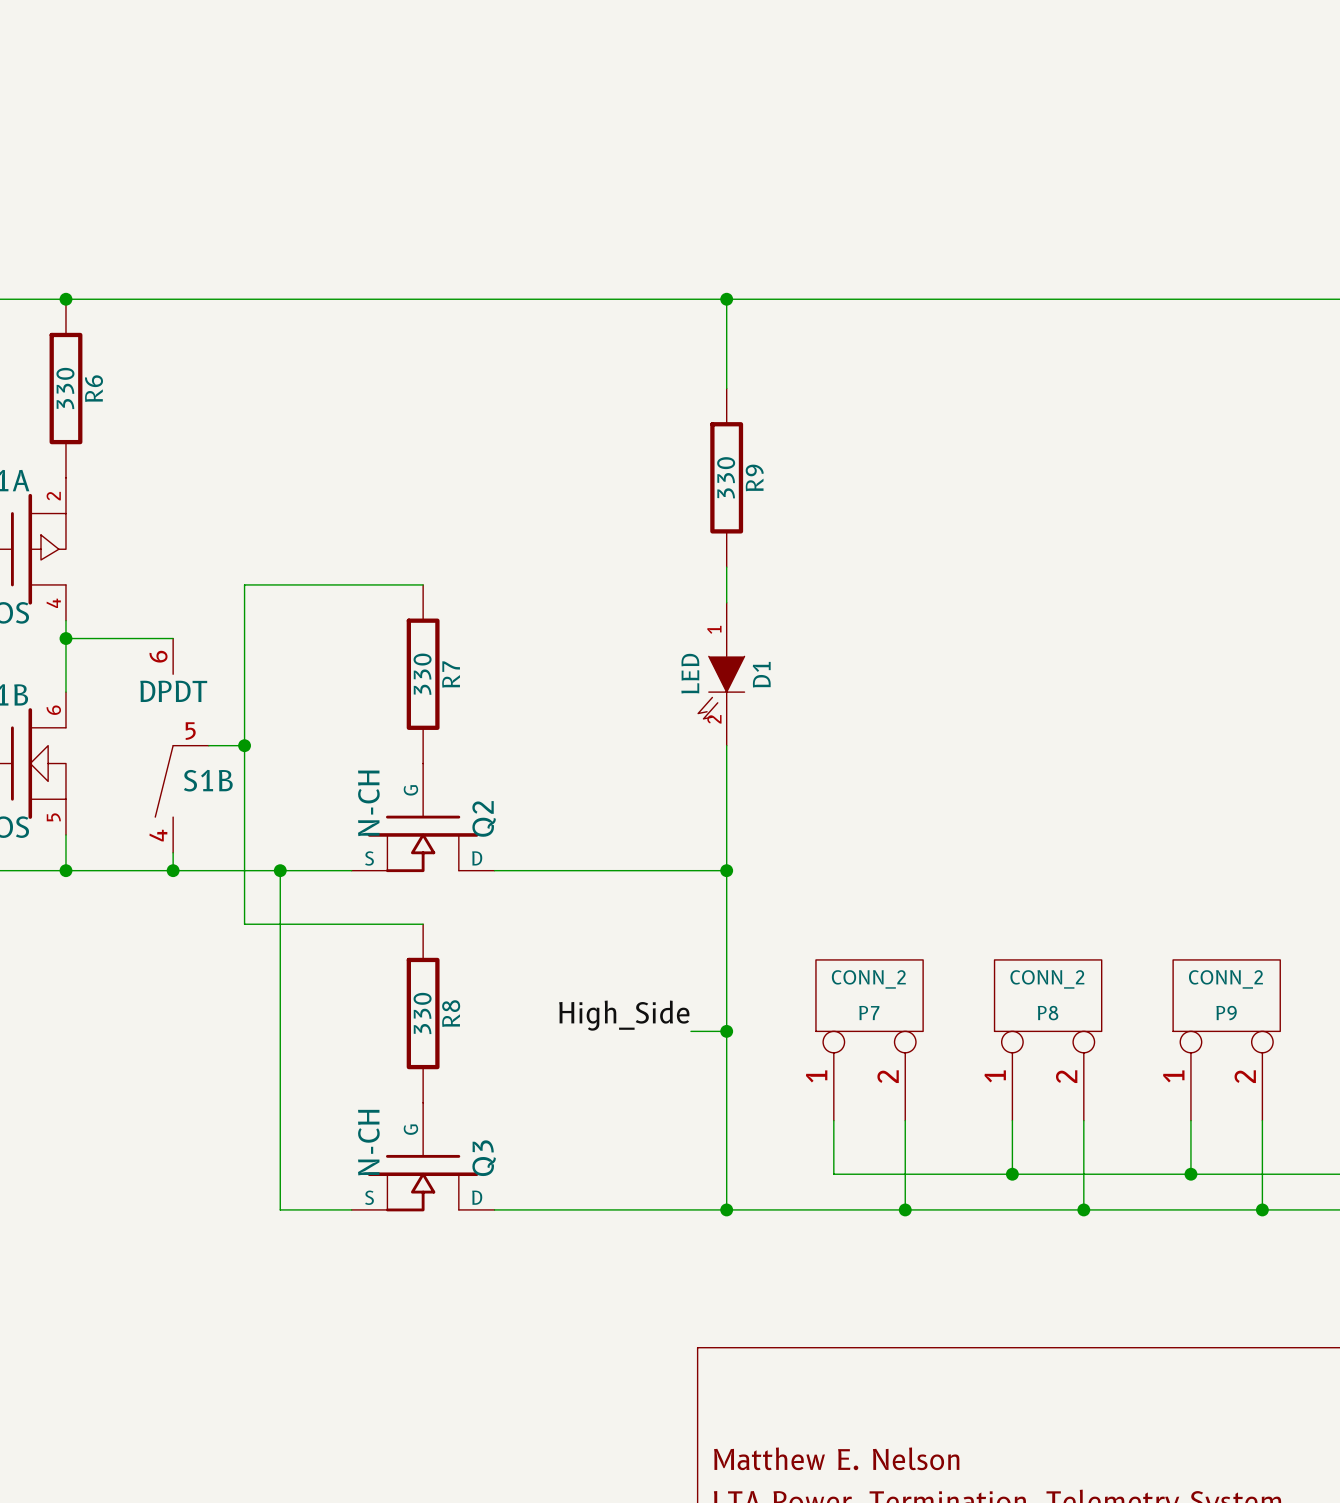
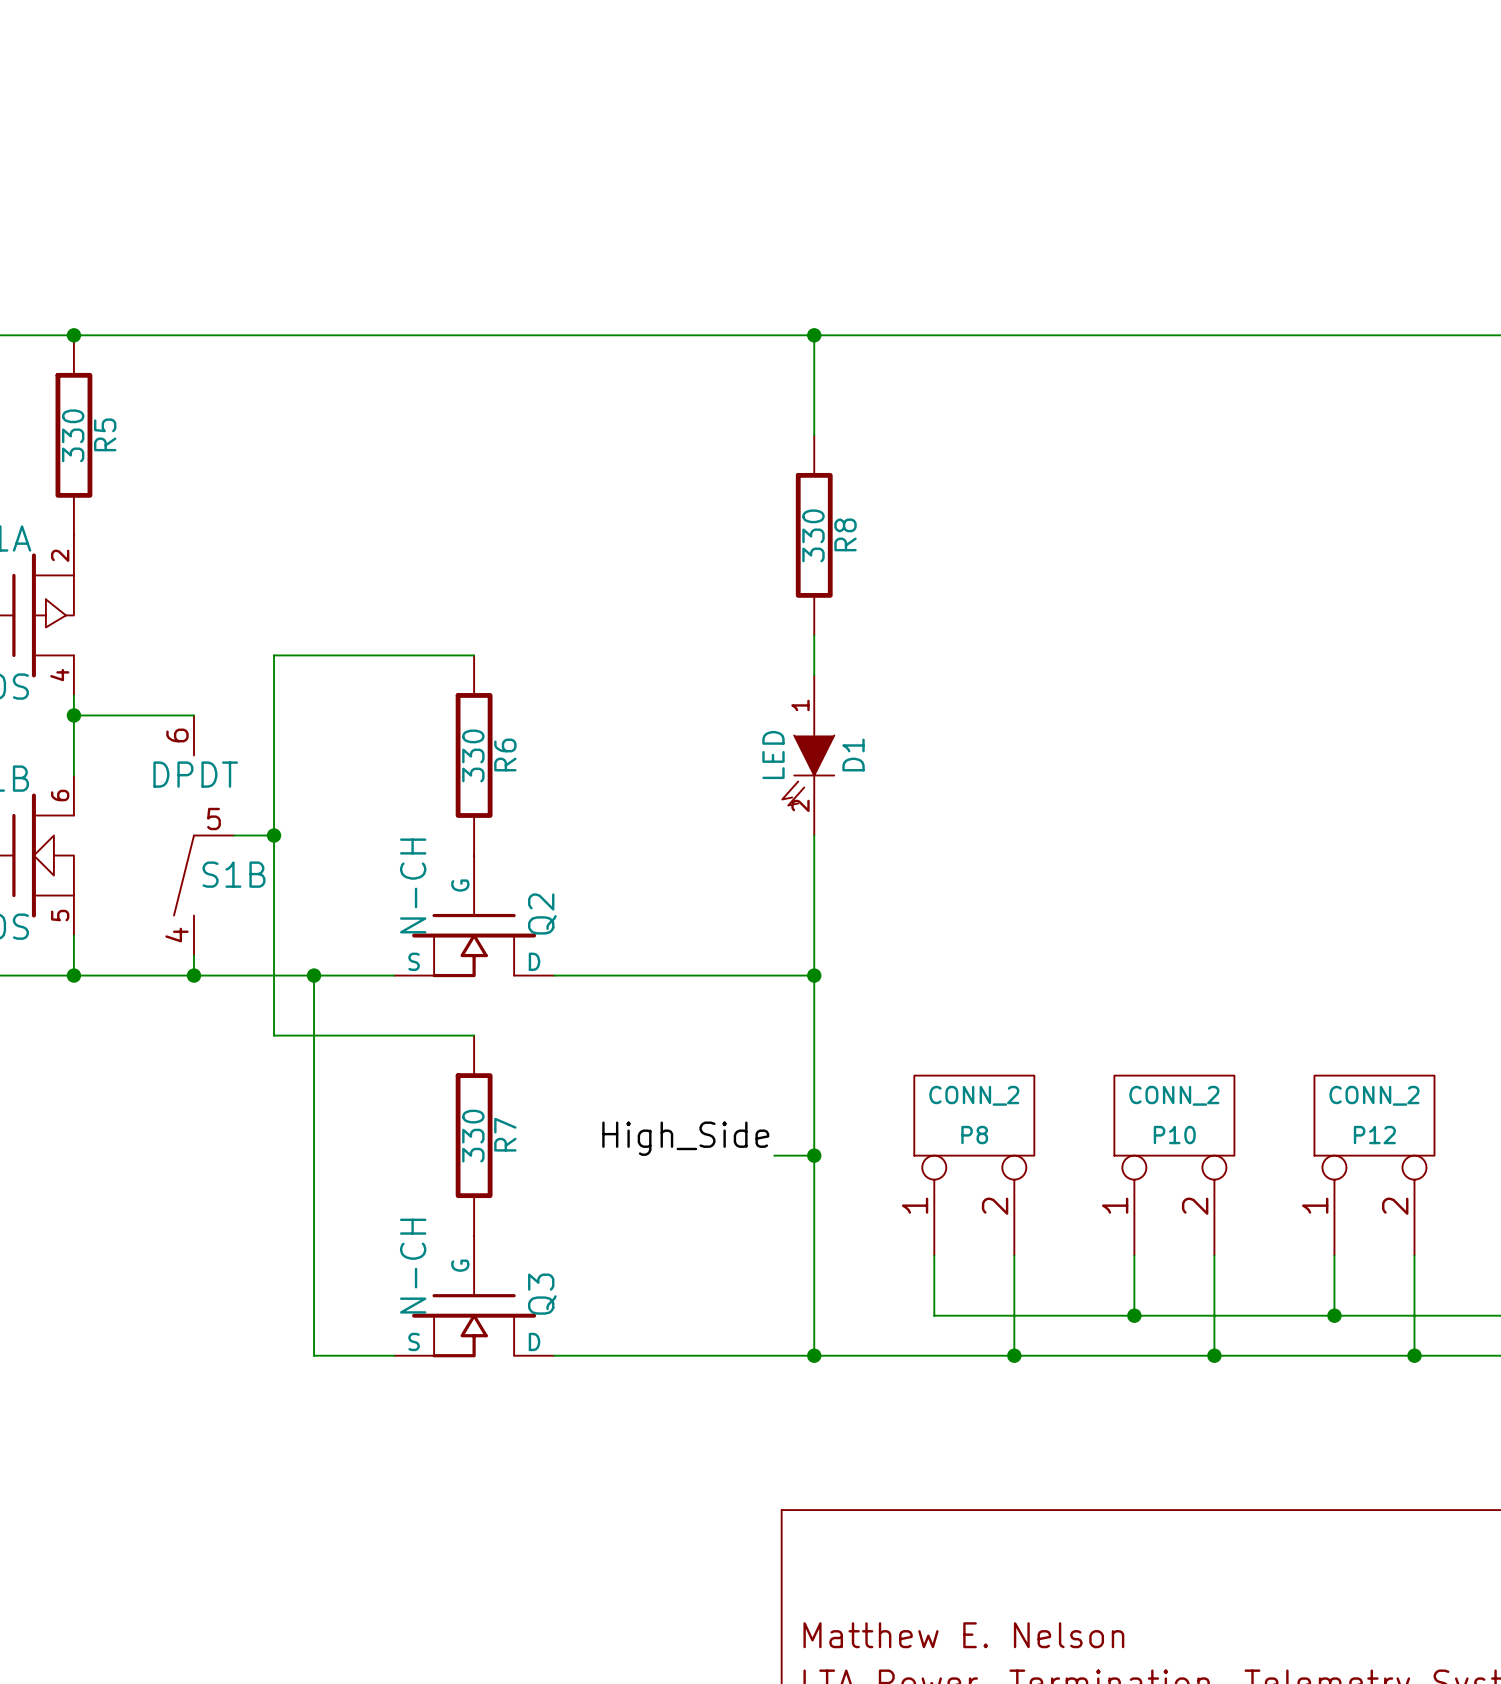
R6 name: R6 (94, 388) -> R5 (105, 434)
R9 name: R9 (754, 477) -> R8 (845, 534)
R7 name: R7 (451, 674) -> R6 (505, 755)
R8 name: R8 (451, 1013) -> R7 (505, 1134)
P7 name: P7 (869, 1013) -> P8 (974, 1135)
P8 name: P8 (1048, 1013) -> P10 (1174, 1135)
P9 name: P9 (1226, 1013) -> P12 (1374, 1135)

